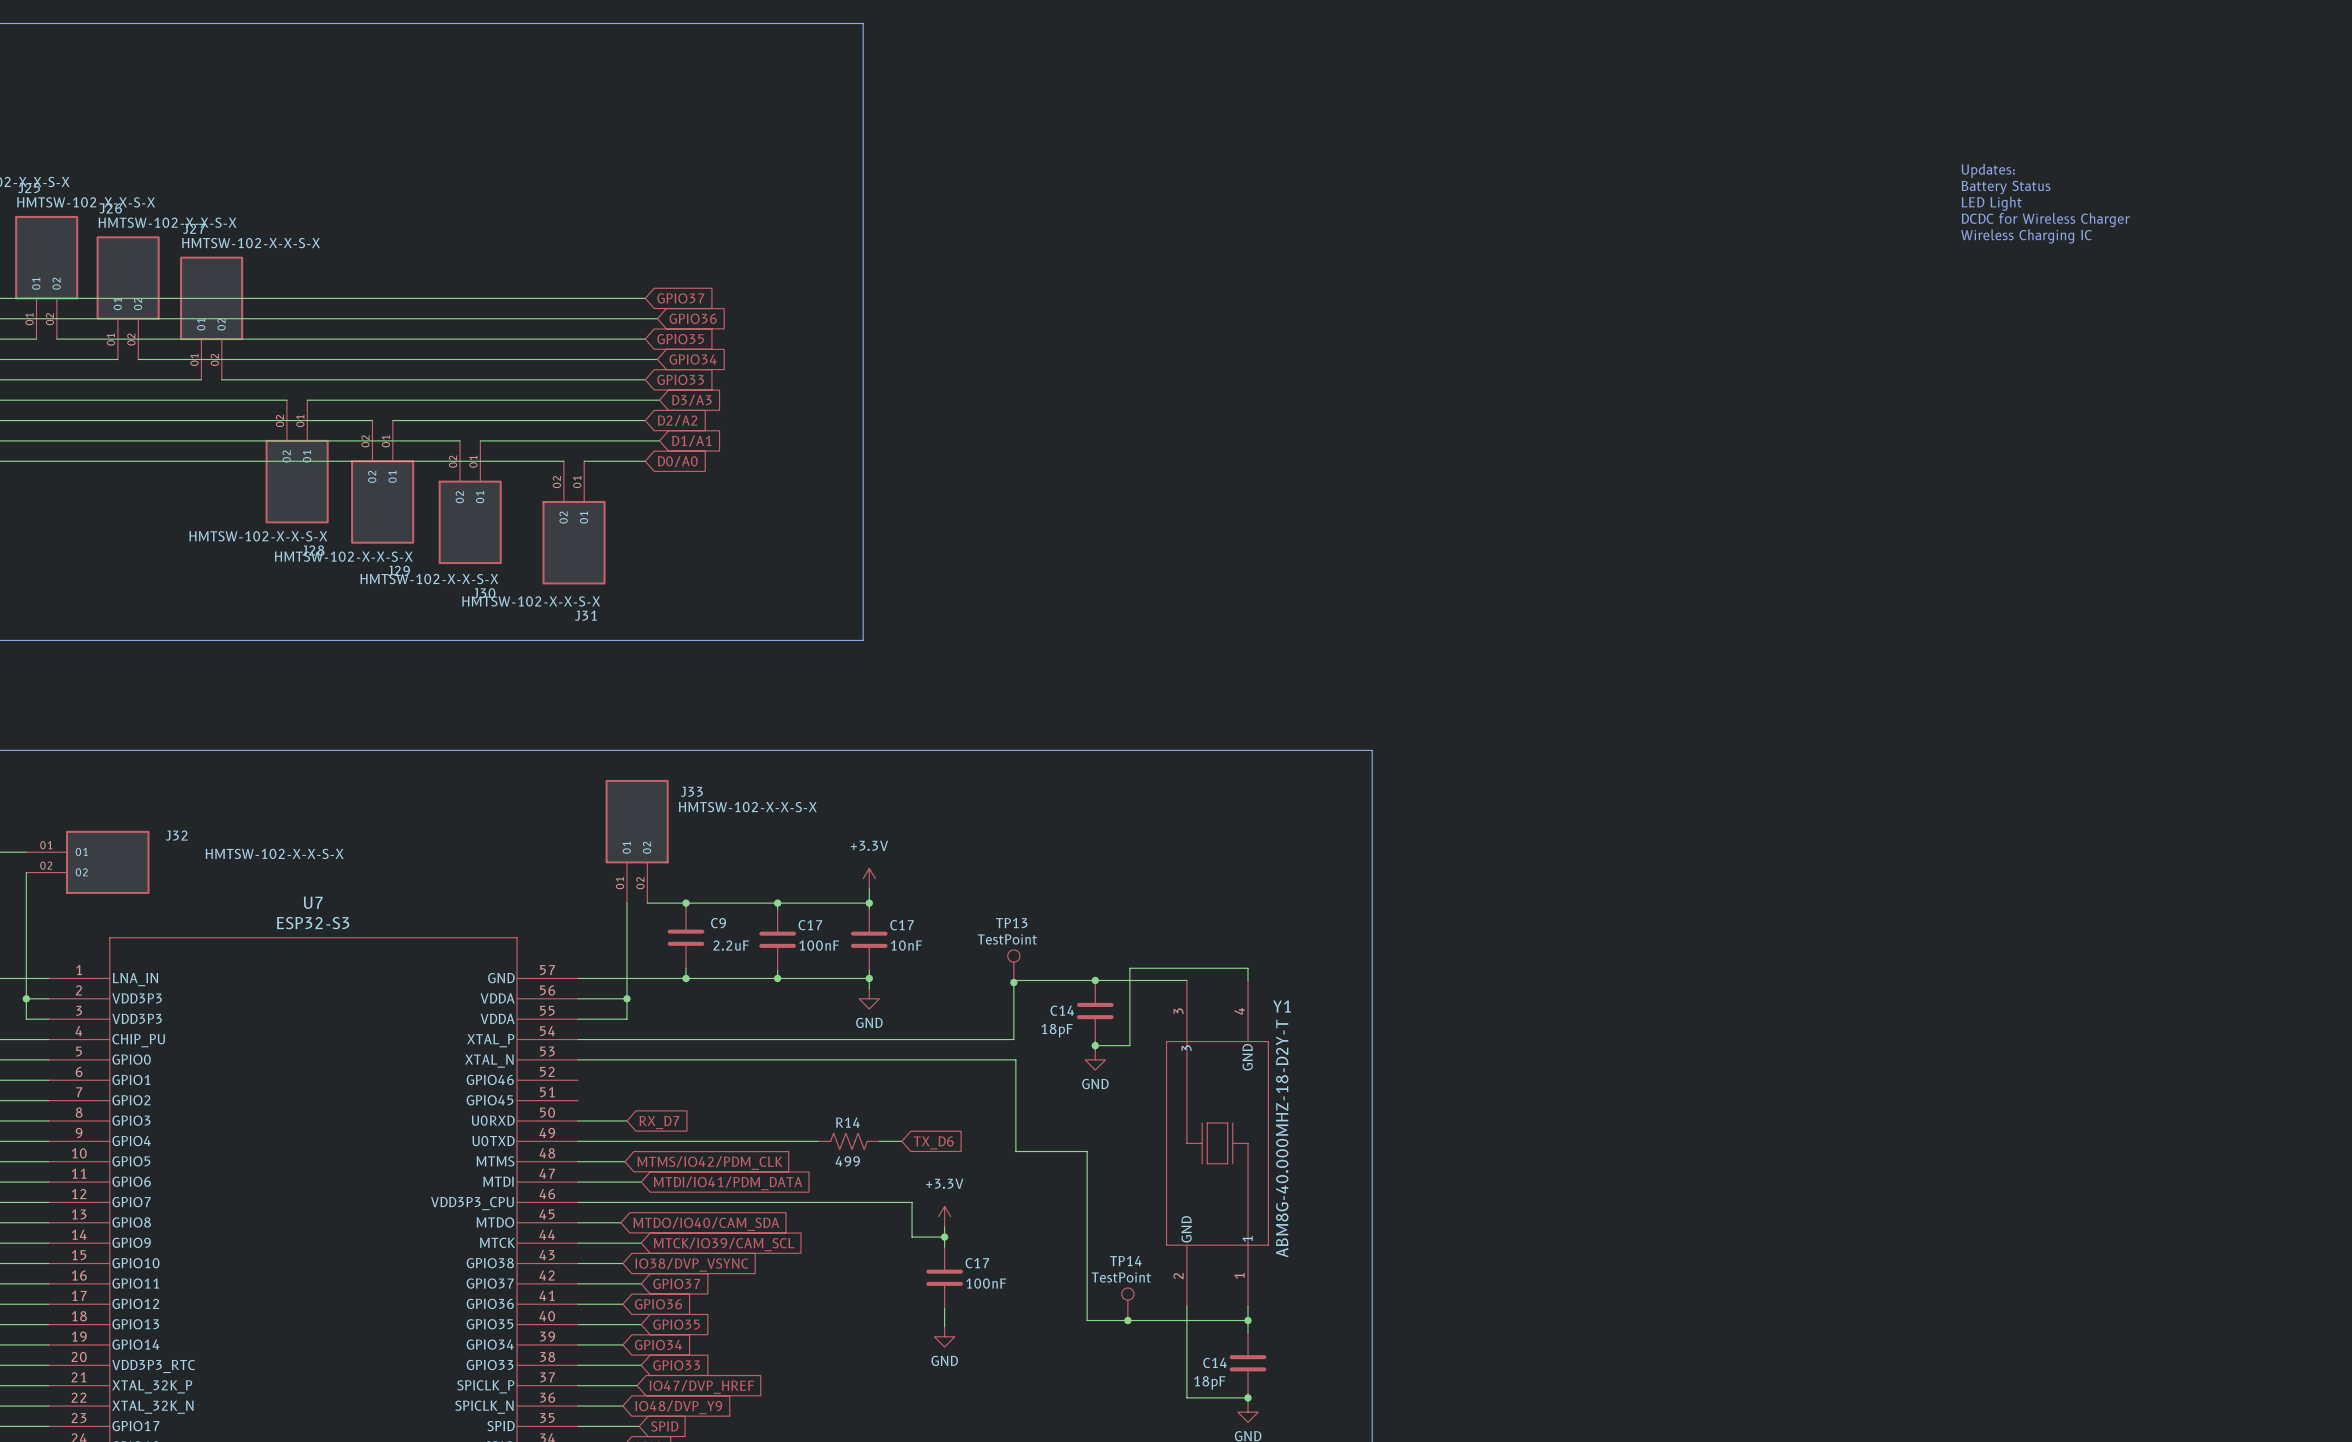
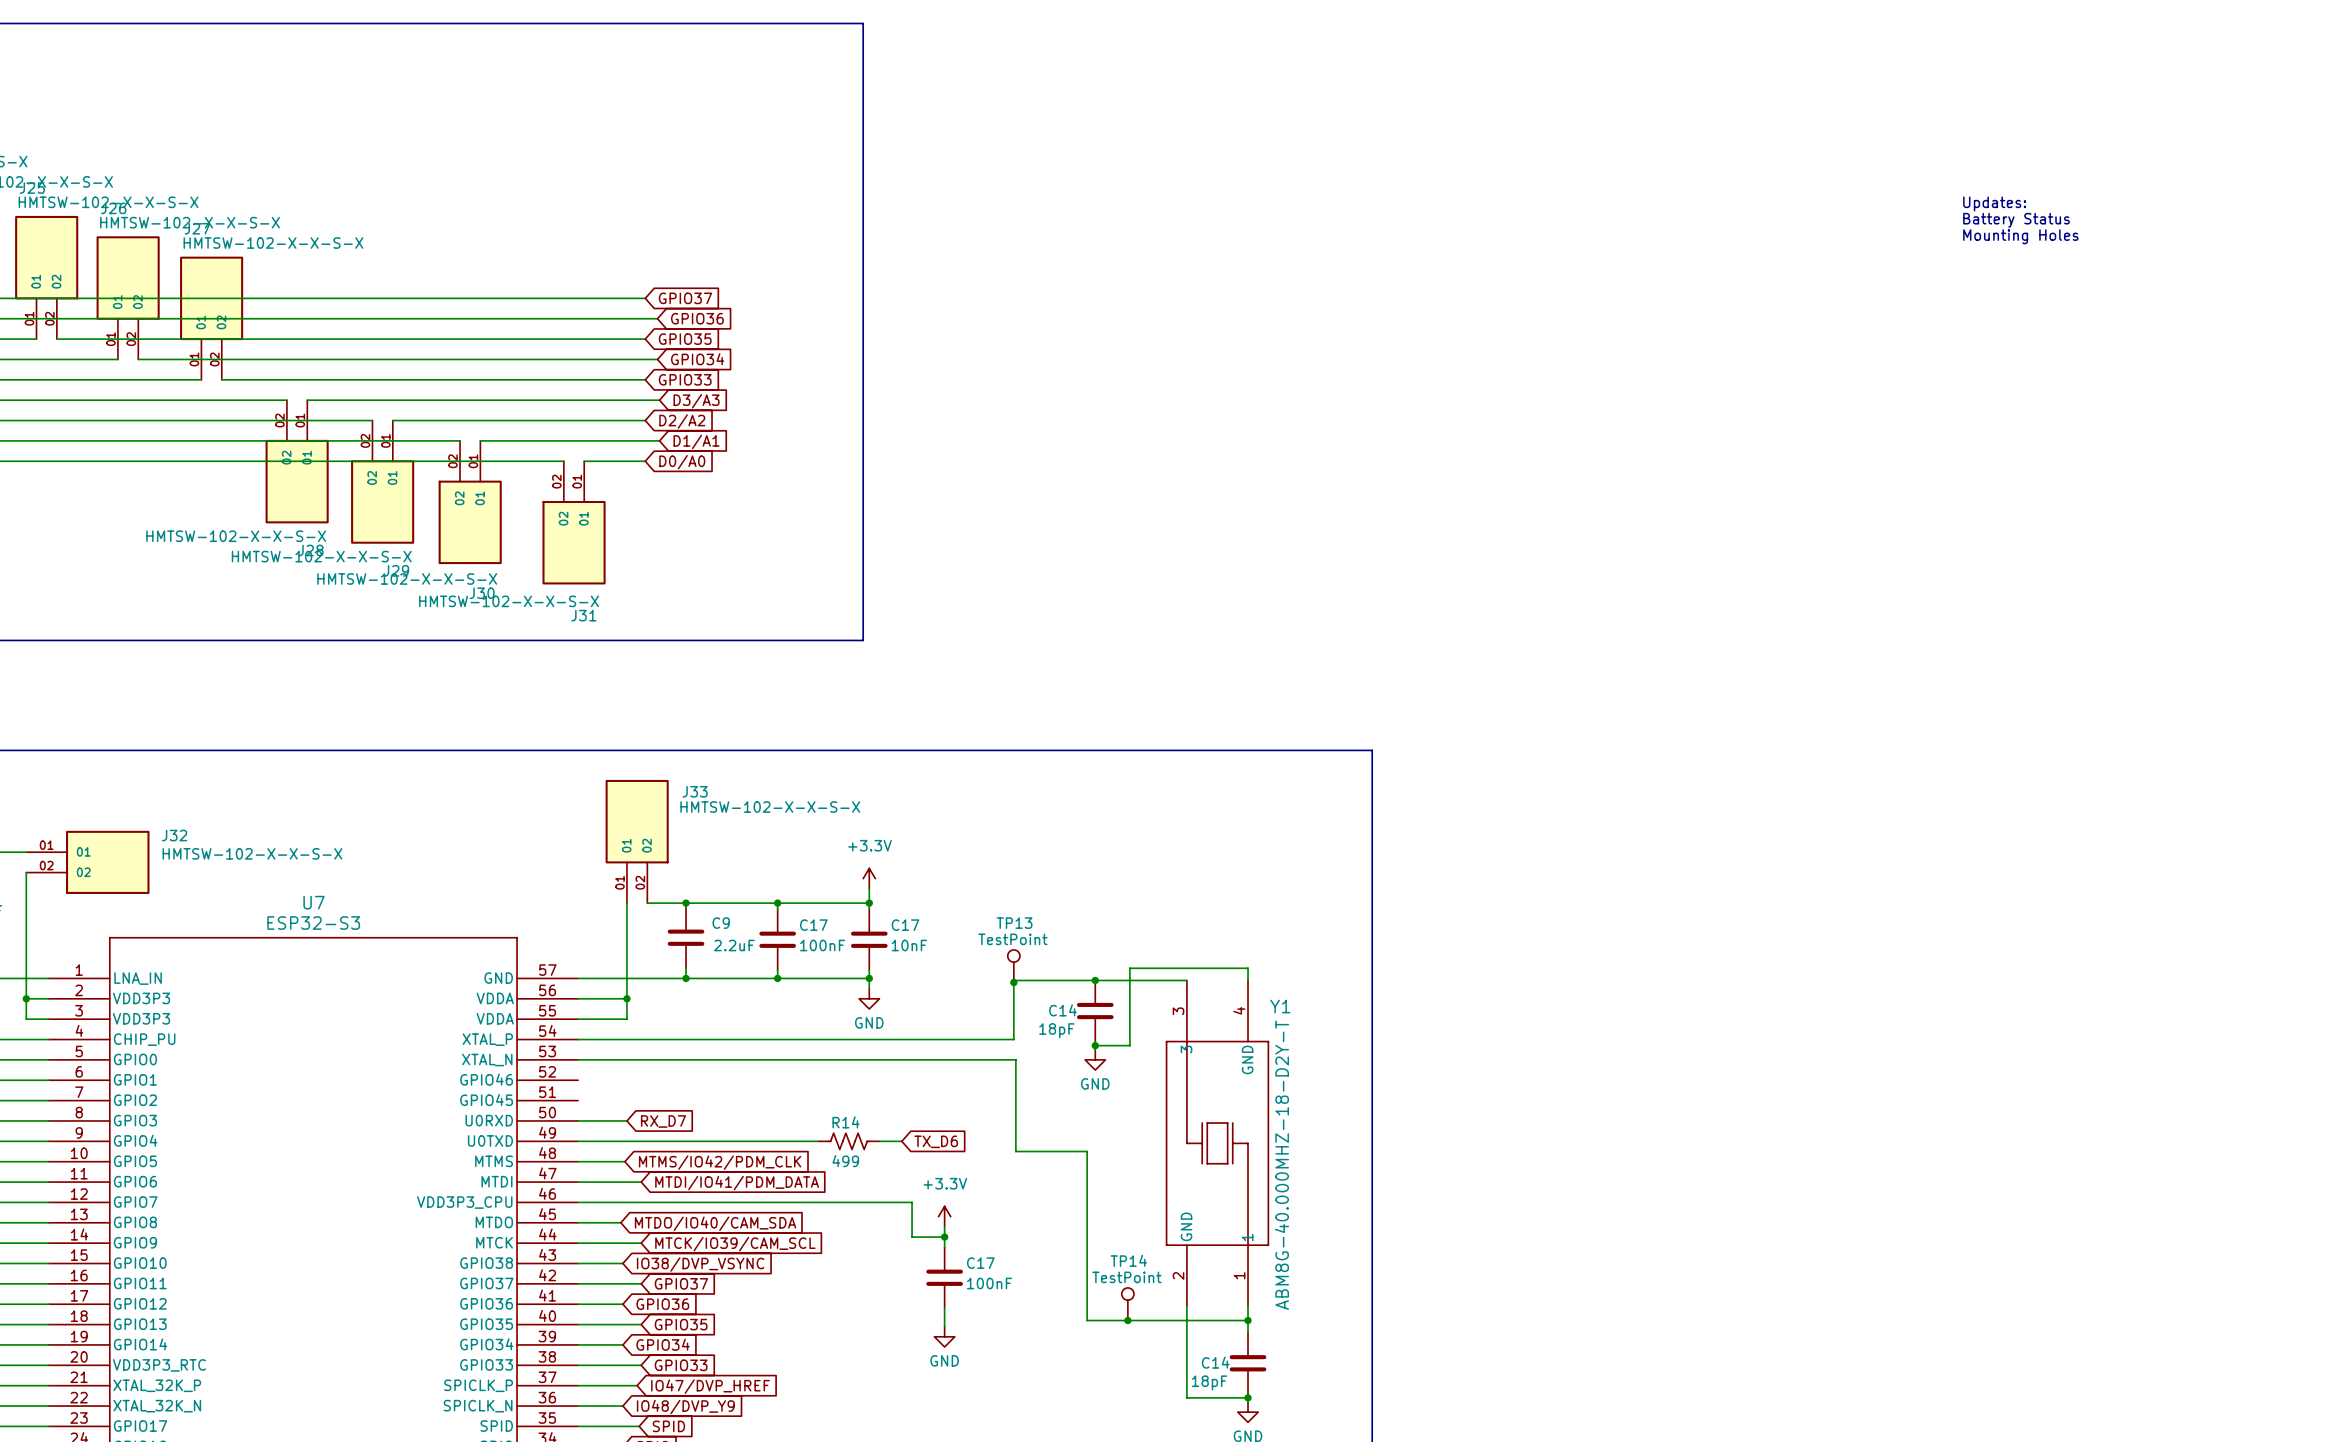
text: Updates: (1988, 170) -> none
text: Battery Status (2006, 187) -> none
text: LED Light (1991, 203) -> Updates: (1994, 203)
text: DCDC for Wireless Charger (2045, 220) -> Battery Status (2016, 220)
text: Wireless Charging IC (2026, 236) -> Mounting Holes (2020, 236)

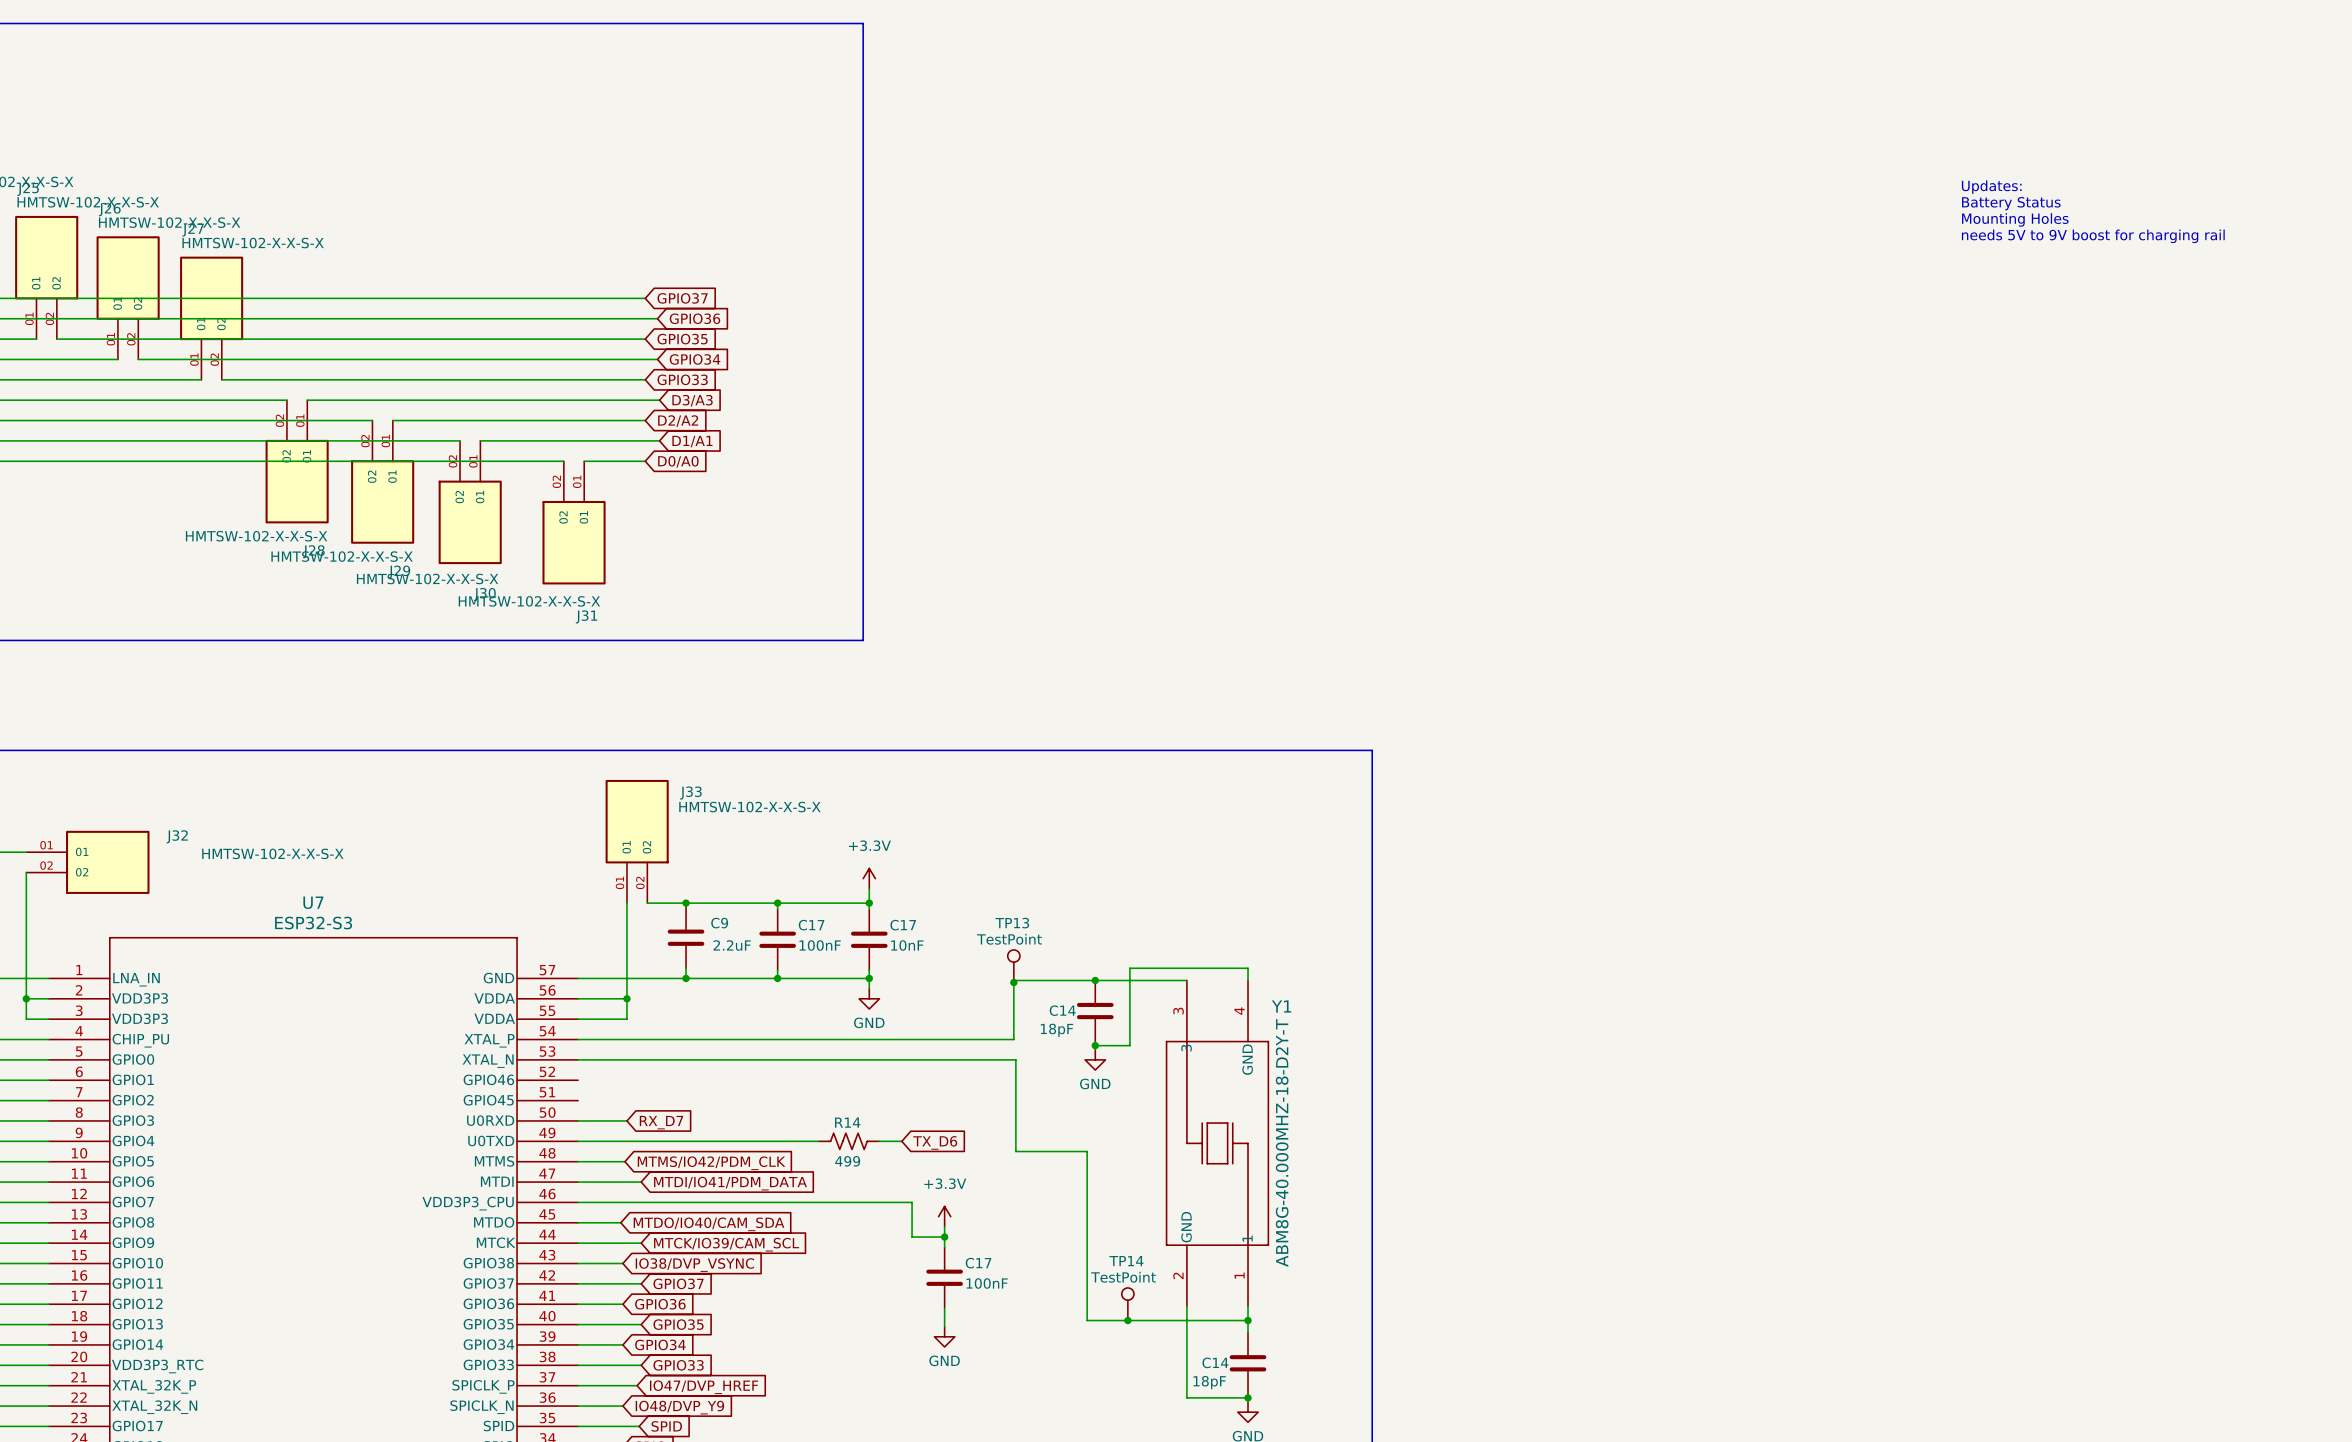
text: none -> Updates: (1991, 187)
text: Updates: (1994, 203) -> Battery Status (2011, 203)
text: Battery Status (2016, 220) -> Mounting Holes (2015, 219)
text: Mounting Holes (2020, 236) -> needs 5V to 9V boost for charging rail (2093, 236)

